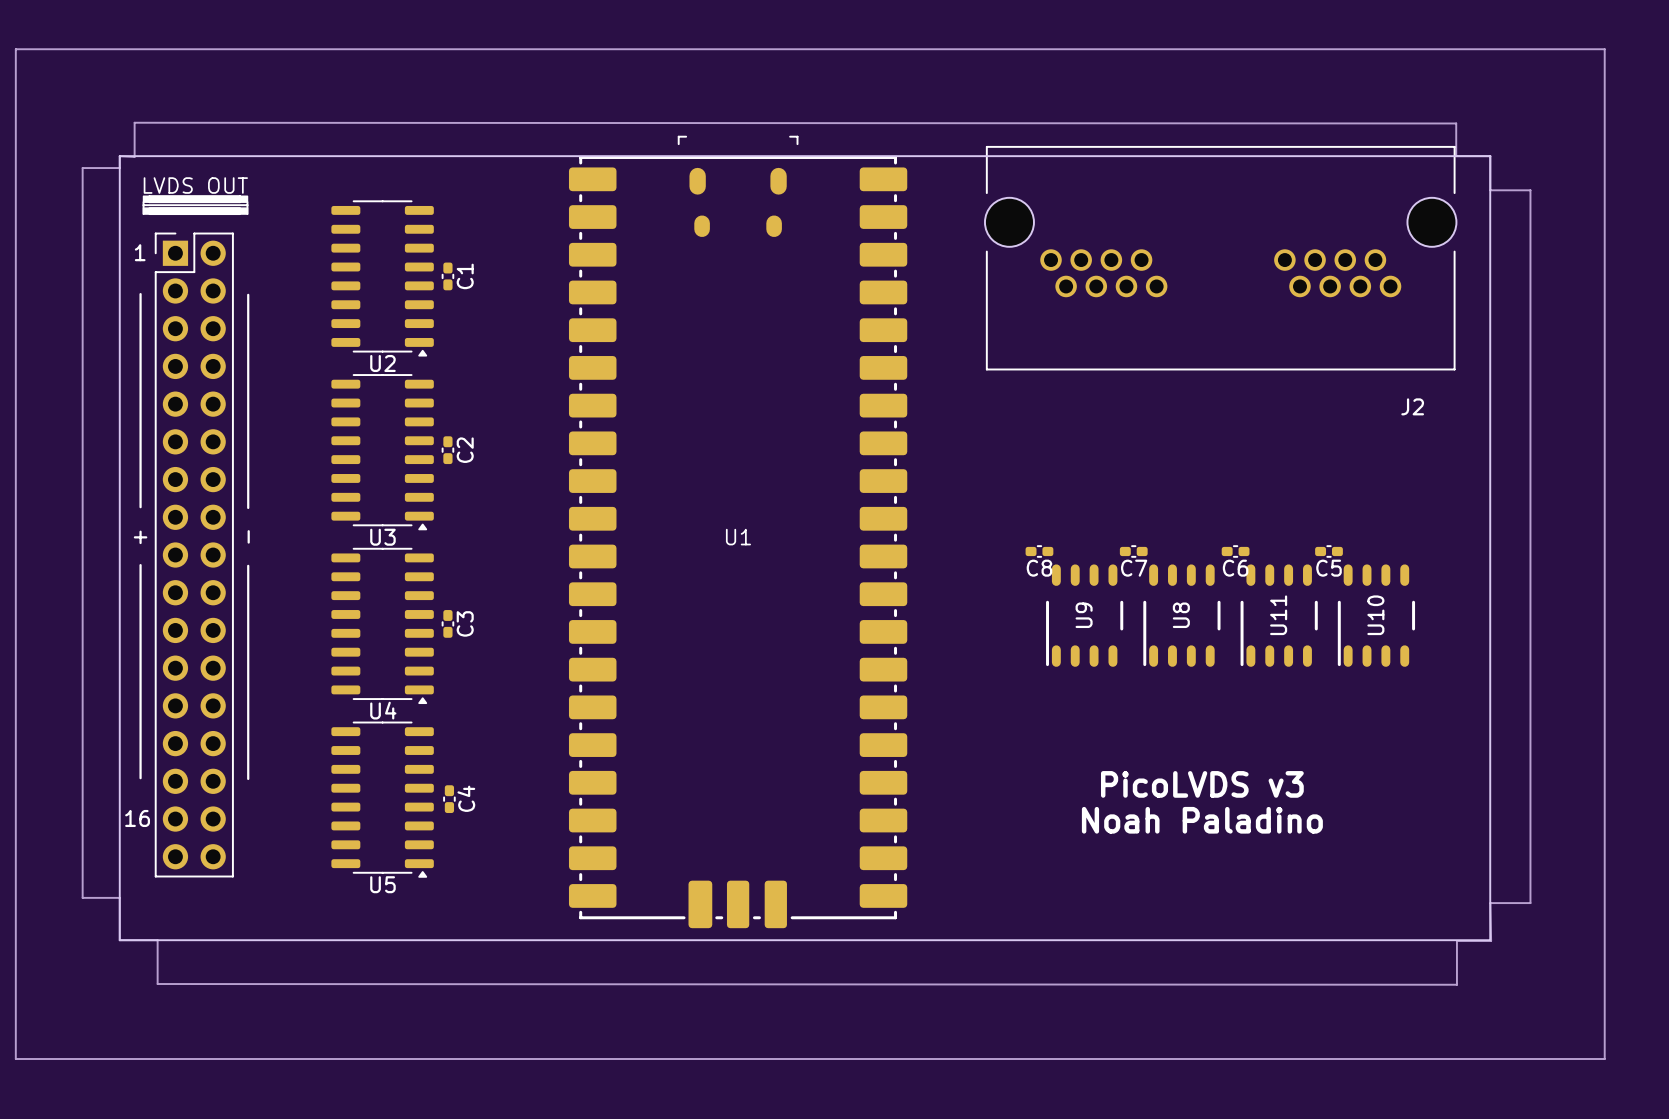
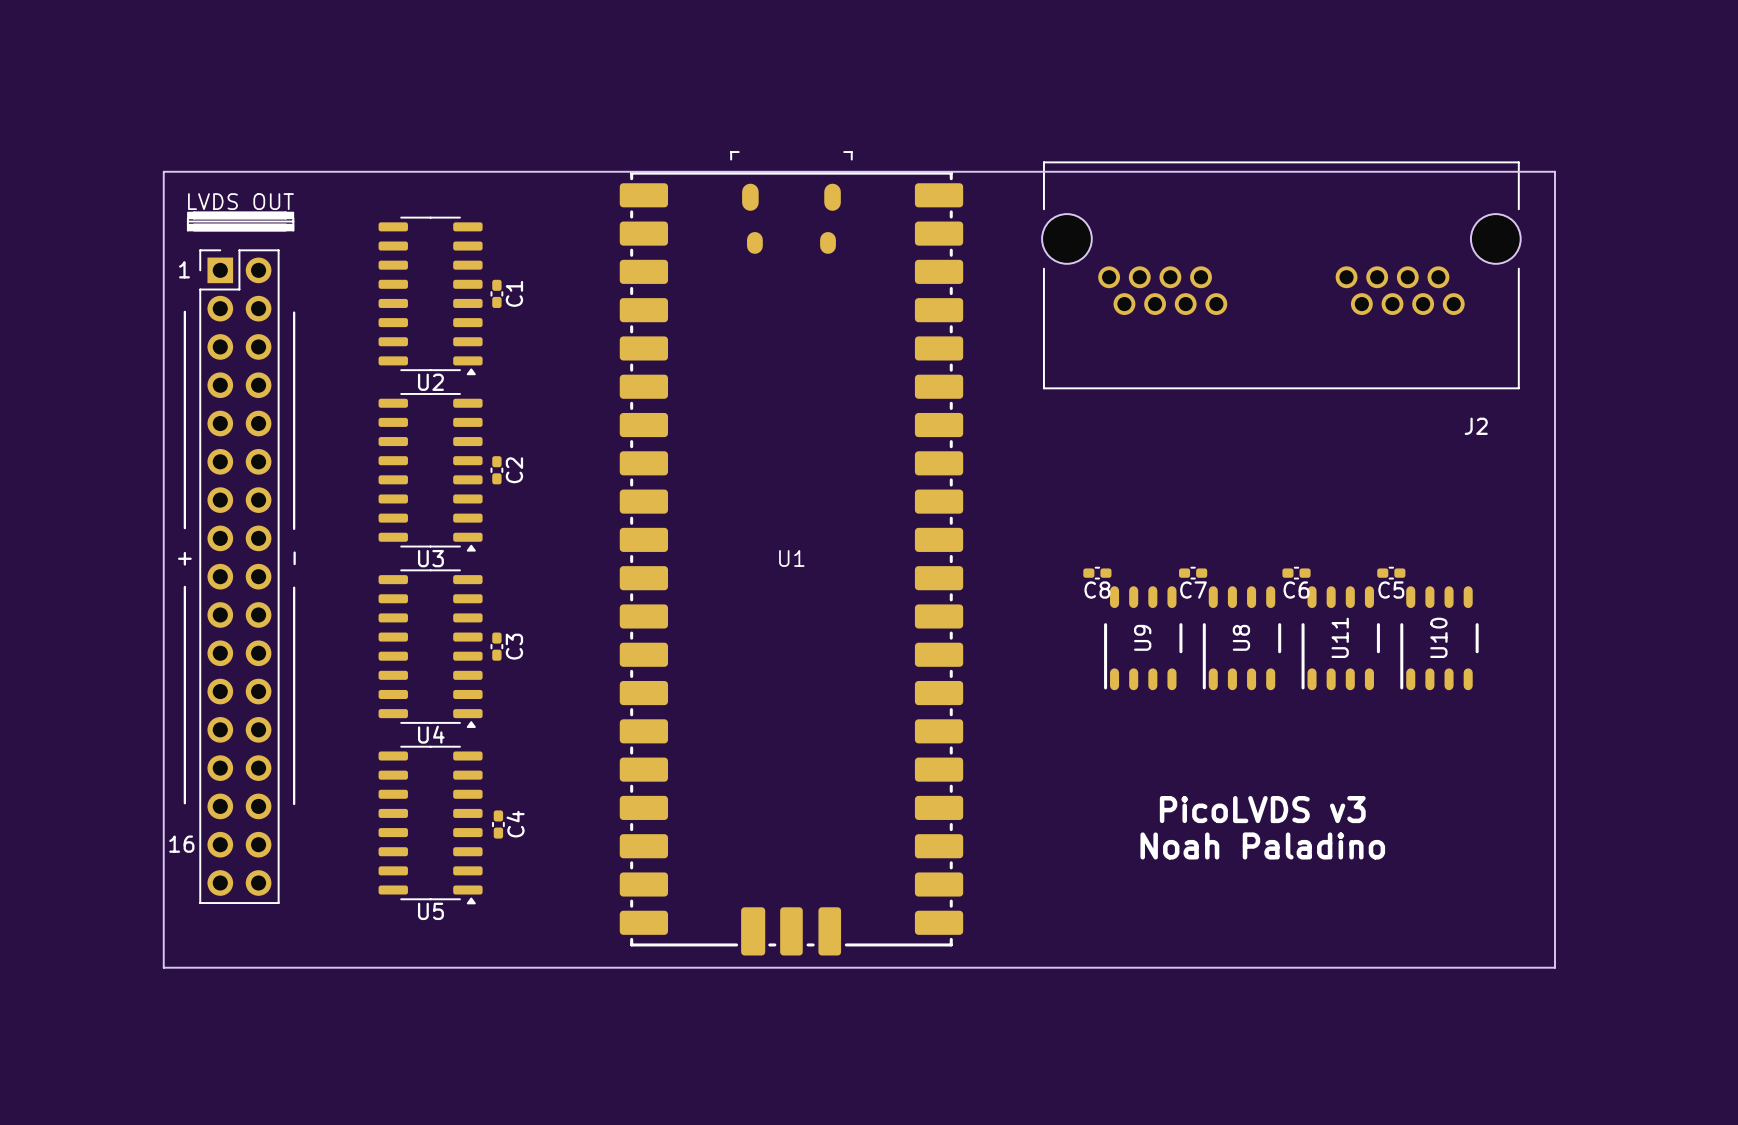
line: (15, 49) (1604, 49) (1604, 1059) (15, 1059) (15, 49) -> none
line: (134, 122) (134, 156) (119, 156) (119, 168) (82, 168) (82, 897) (119, 897) (119, 940) (157, 940) (157, 984) (1456, 984) (1456, 940) (1491, 940) (1490, 903) (1530, 903) (1530, 190) (1490, 190) (1490, 156) (1456, 156) (1456, 123) (134, 122) -> none

